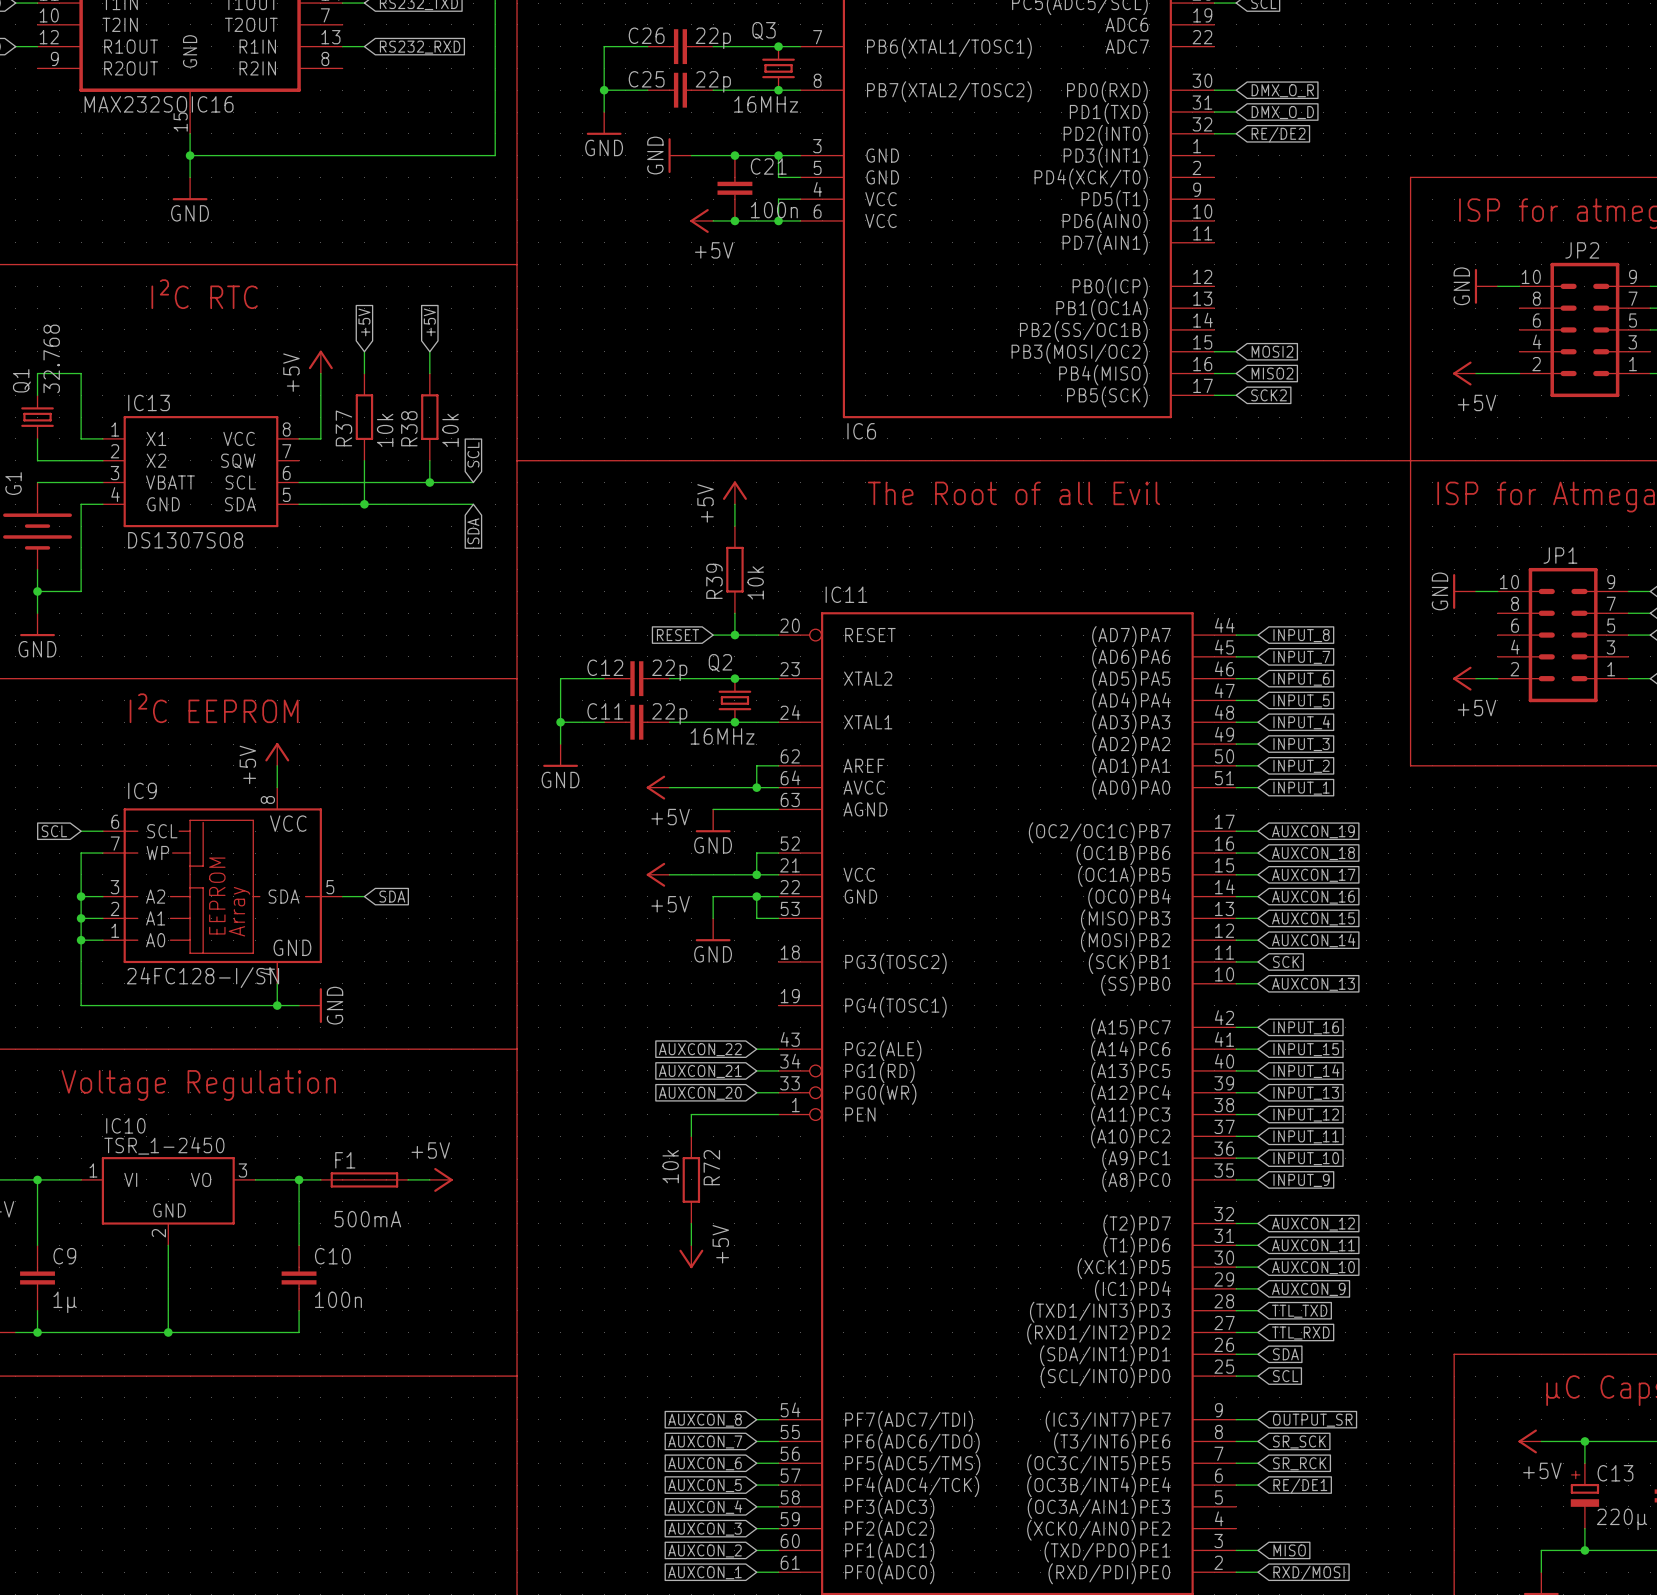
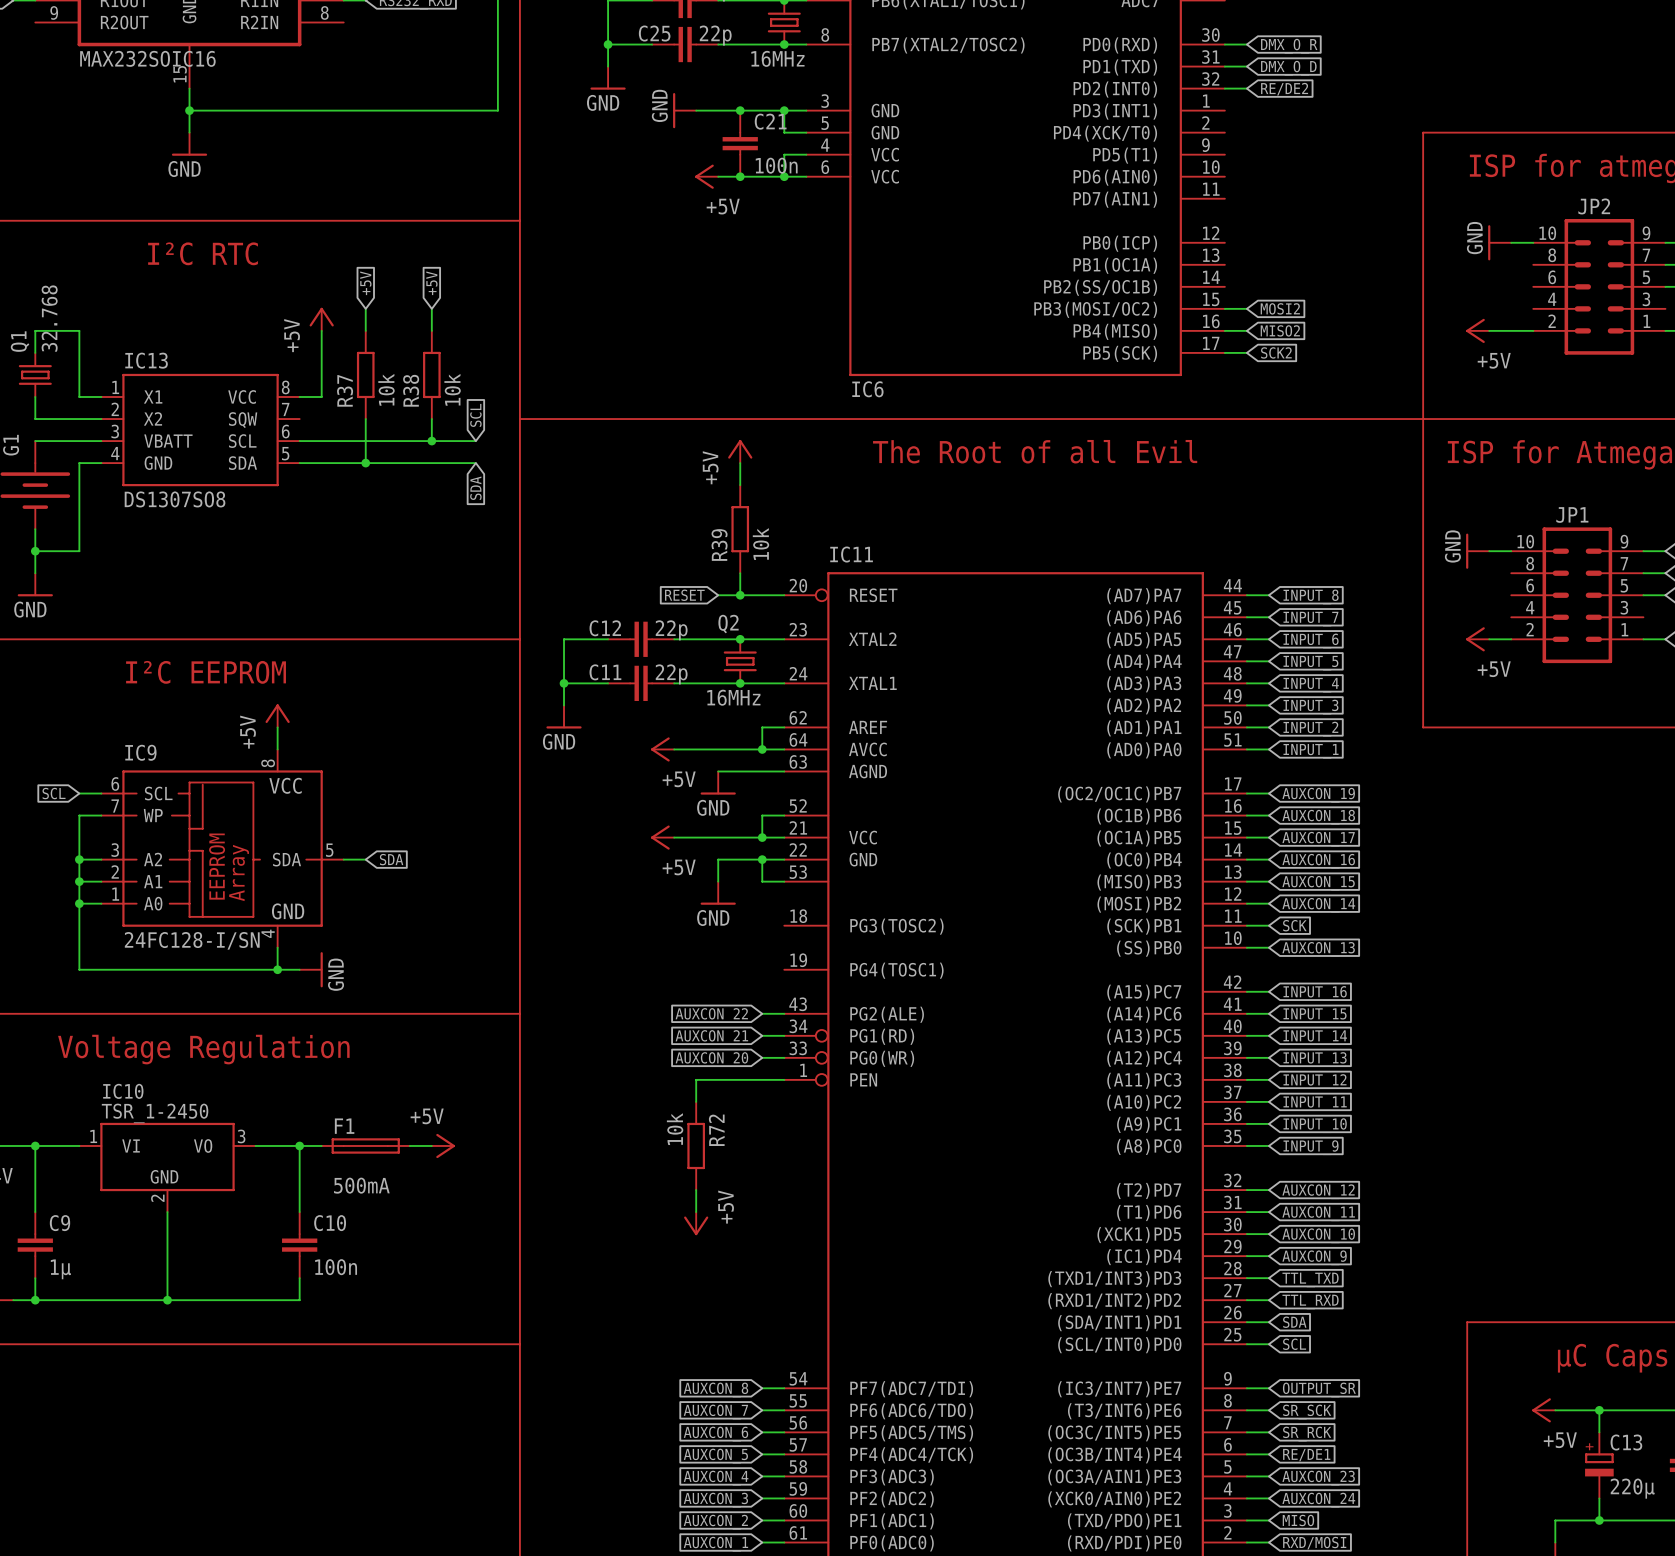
wire: none -> (1246, 1476) (1268, 1476)
global label: none -> AUXCON_23 (1318, 1478)
wire: none -> (1246, 1498) (1268, 1498)
global label: none -> AUXCON_24 (1318, 1500)

